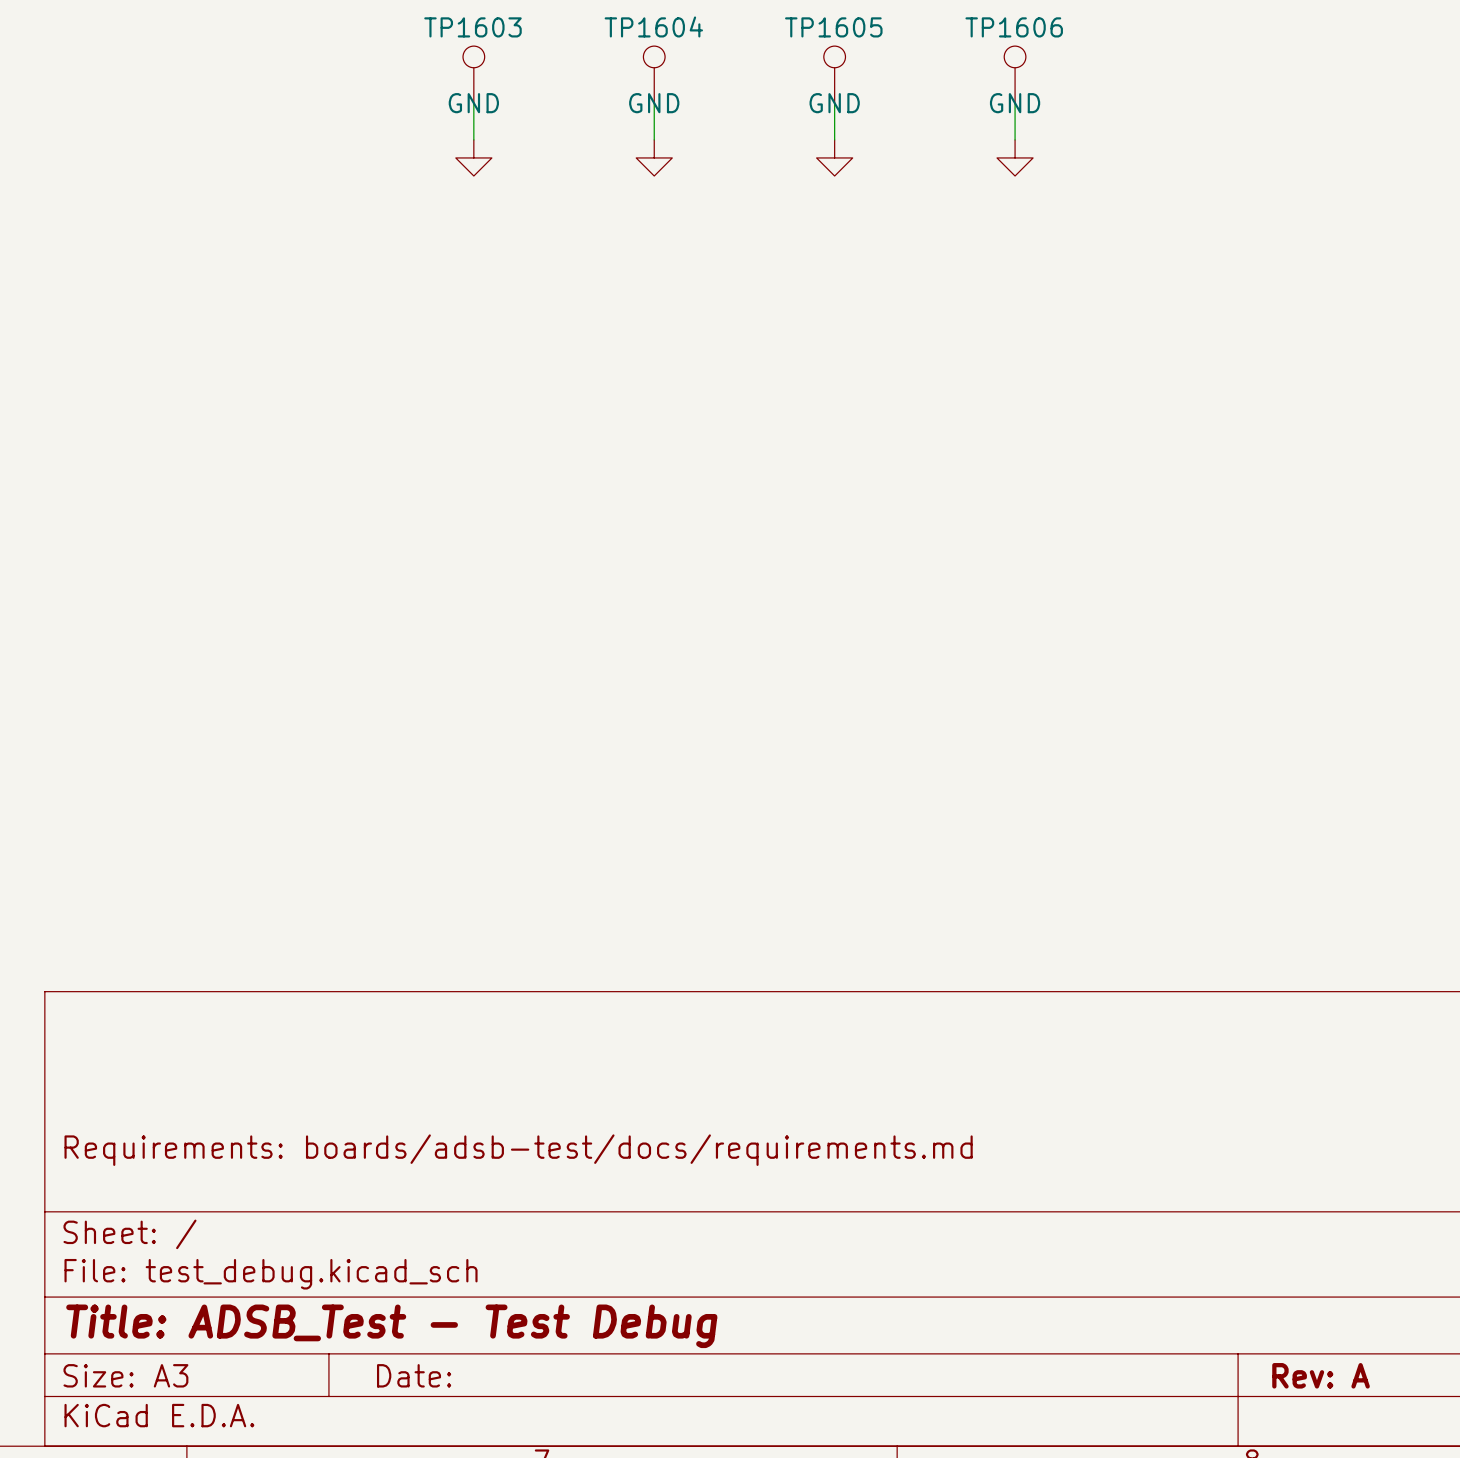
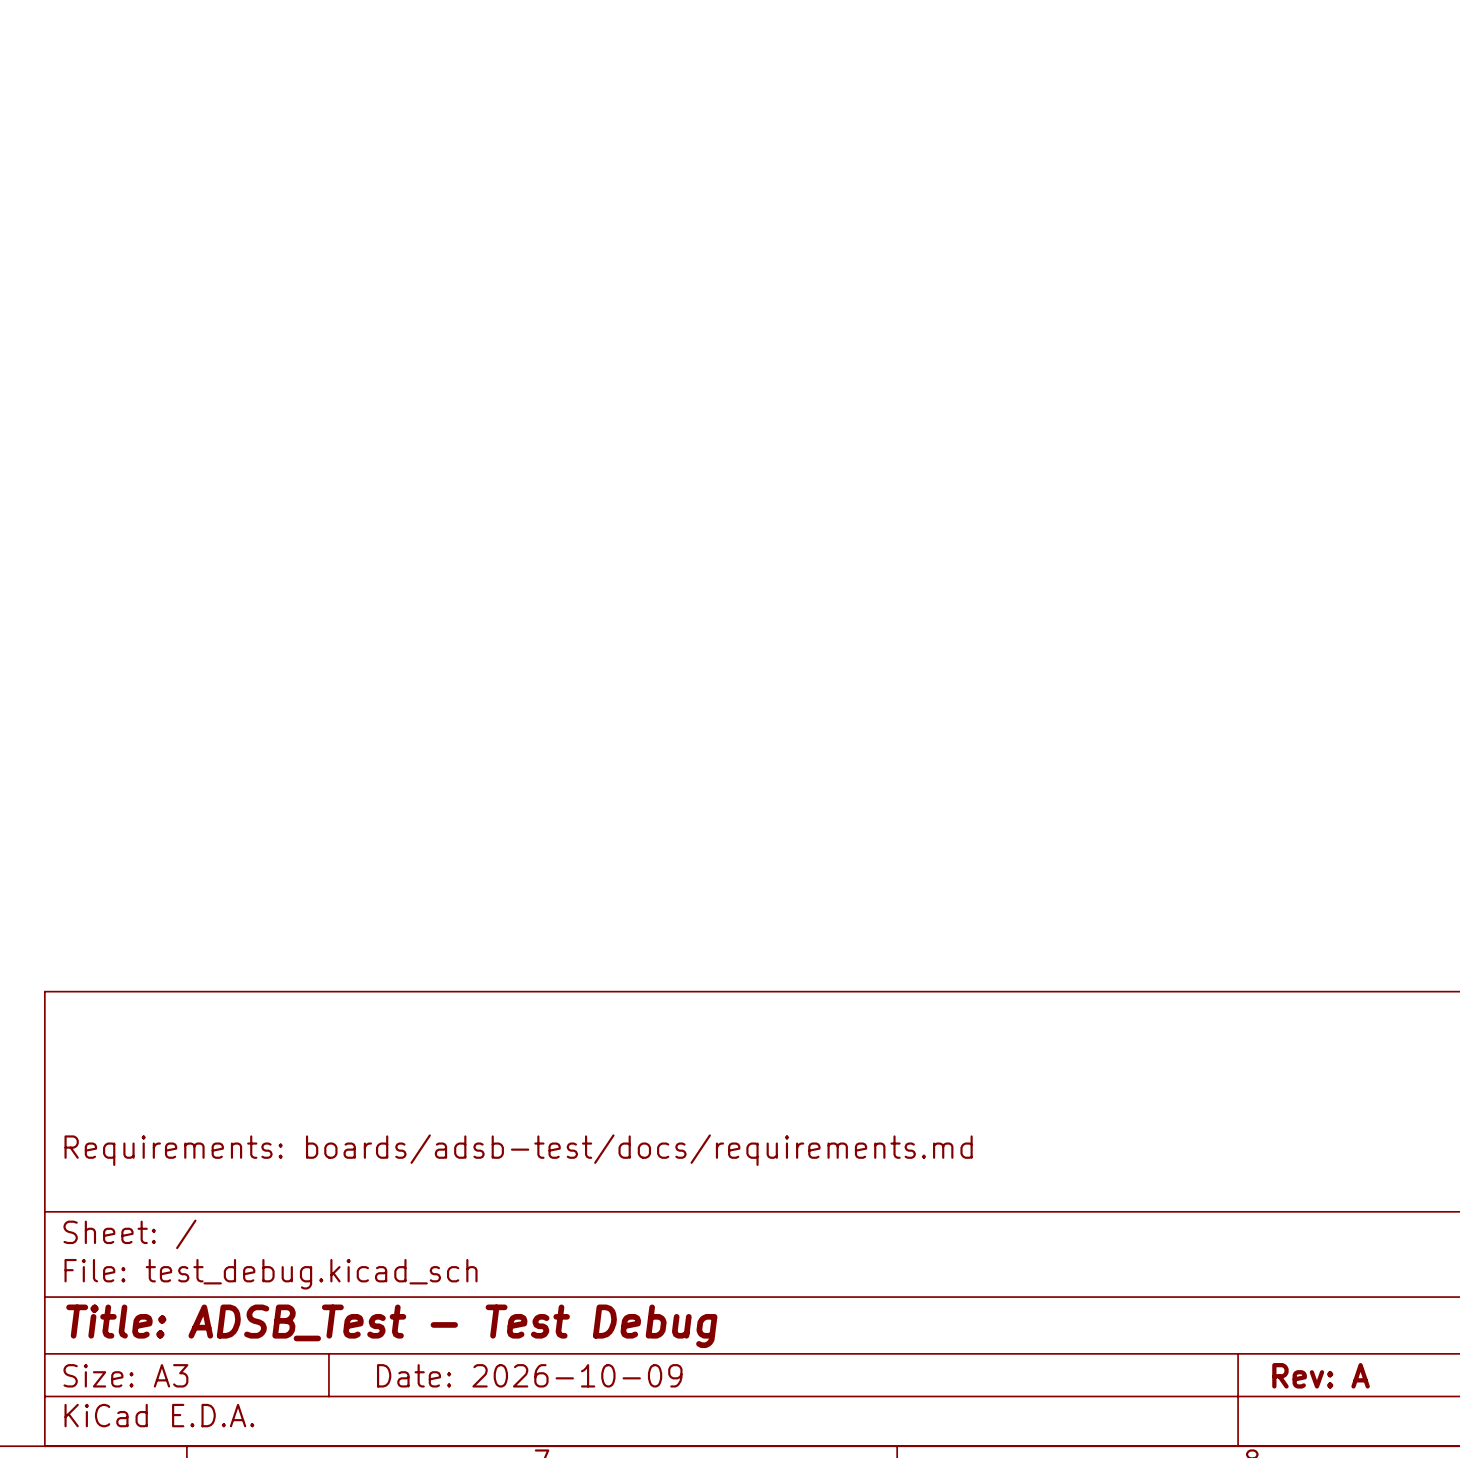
TP1603: GND (473, 74) -> none
TP1604: GND (654, 74) -> none
TP1605: GND (834, 74) -> none
TP1606: GND (1015, 74) -> none
wire: (473, 103) (473, 139) -> none
wire: (654, 103) (654, 139) -> none
wire: (834, 103) (834, 139) -> none
wire: (1015, 103) (1015, 139) -> none
power symbol: (473, 157) -> none
power symbol: (654, 157) -> none
power symbol: (834, 157) -> none
power symbol: (1015, 157) -> none
title block: Date: (414, 1375) -> Date: 2026-10-09 (529, 1375)

